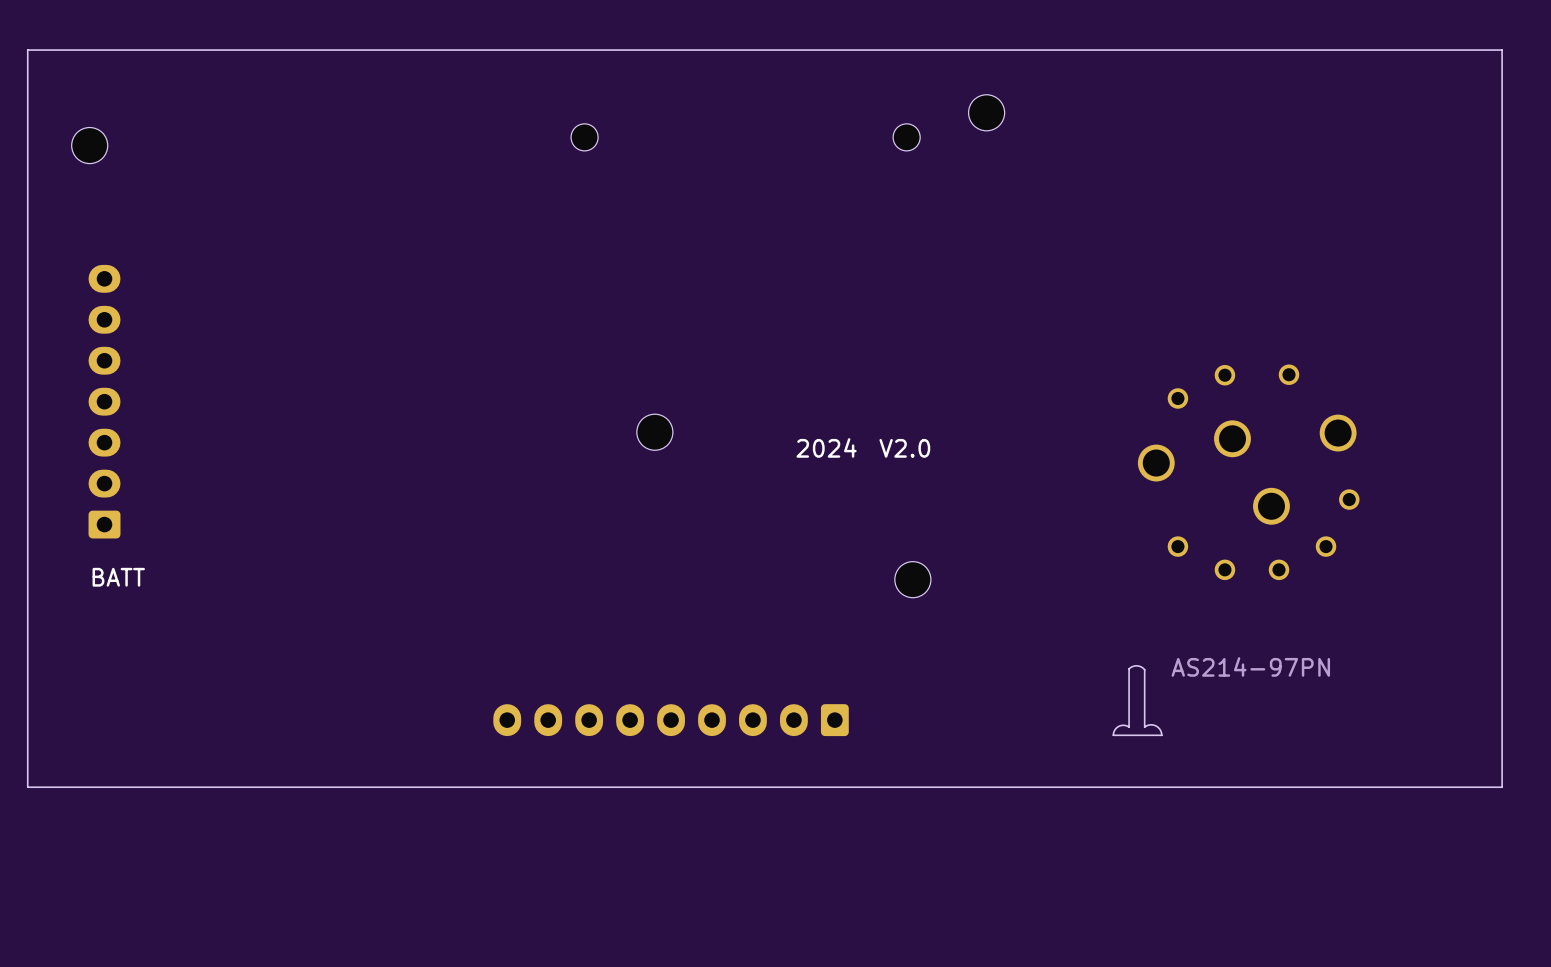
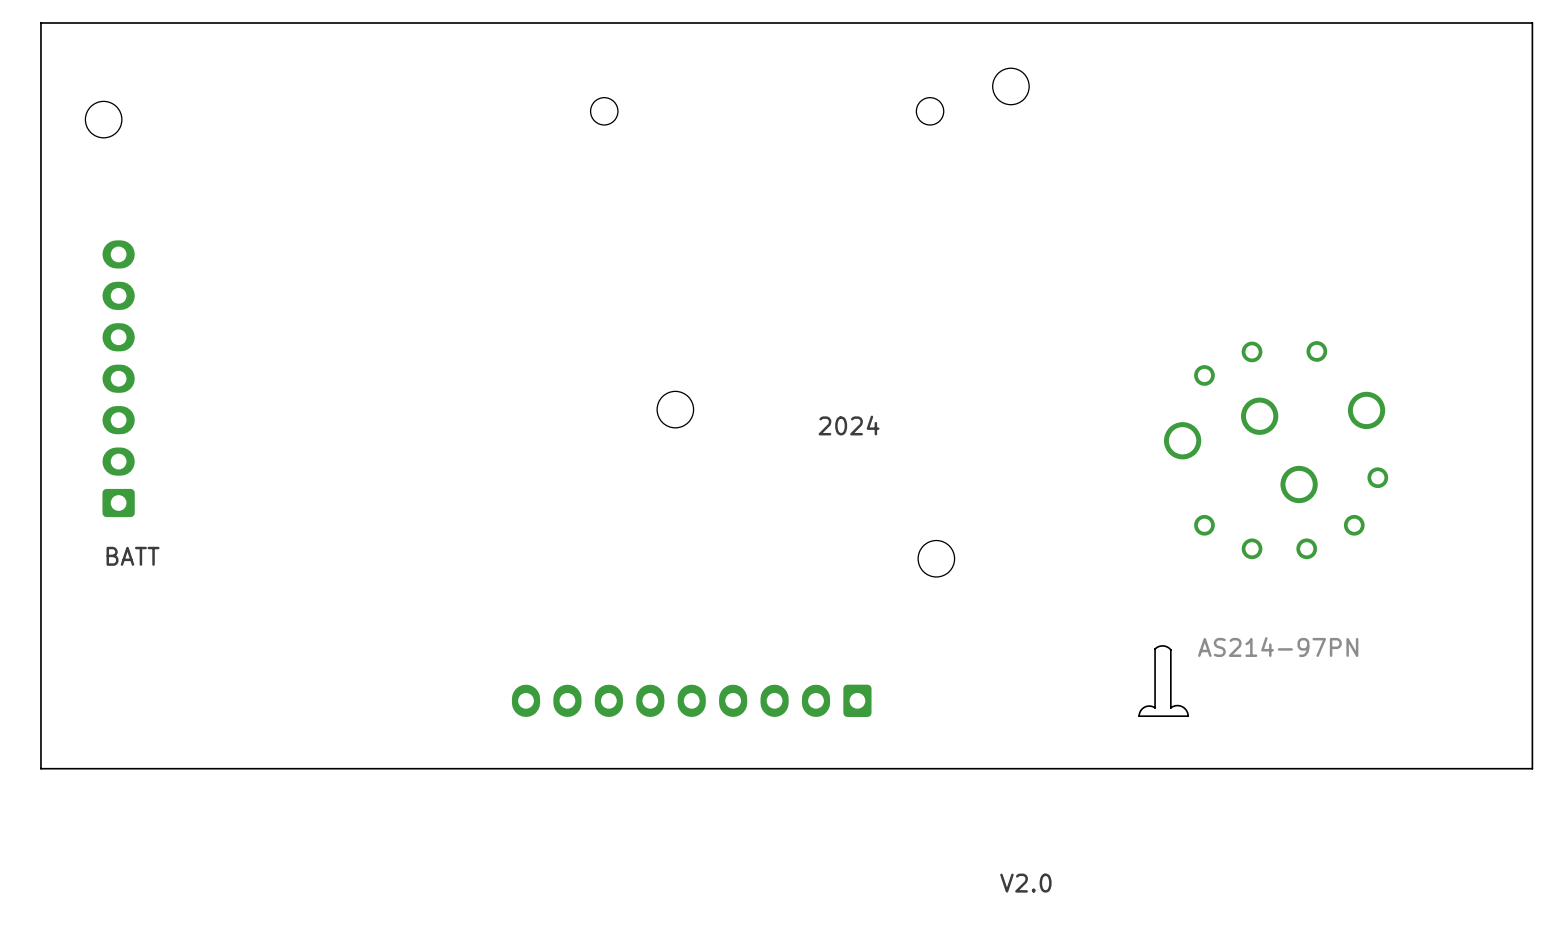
text: V2.0 (904, 448) -> none
text: none -> V2.0 (1025, 883)

